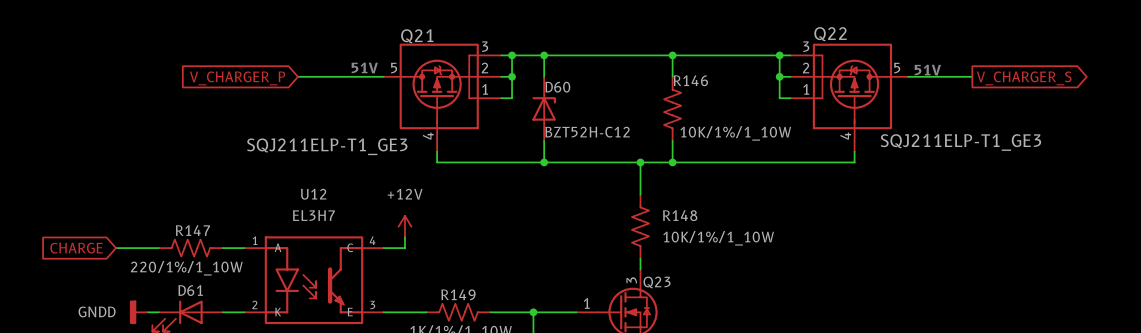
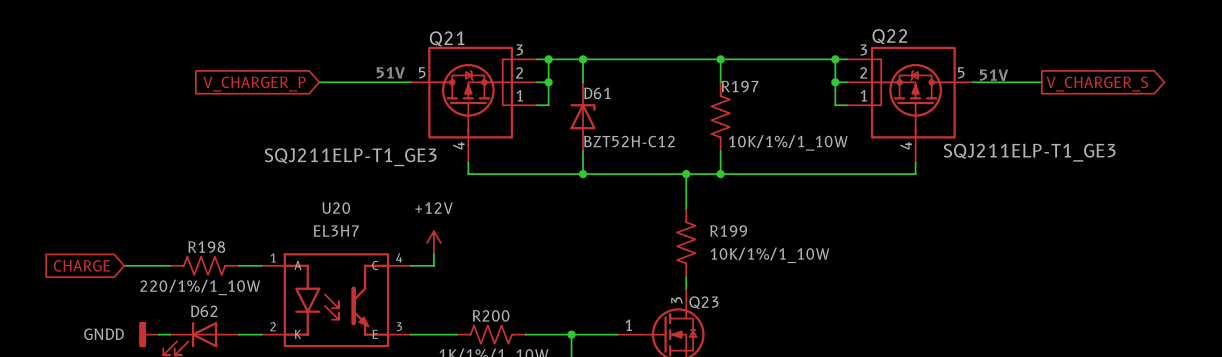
R146 name: R146 (690, 80) -> R197 (740, 86)
D60 name: D60 (557, 87) -> D61 (597, 93)
U12 name: U12 (313, 194) -> U20 (336, 208)
R148 name: R148 (680, 215) -> R199 (728, 231)
R147 name: R147 (192, 230) -> R198 (206, 247)
D61 name: D61 (190, 290) -> D62 (204, 311)
R149 name: R149 (458, 294) -> R200 (491, 315)

